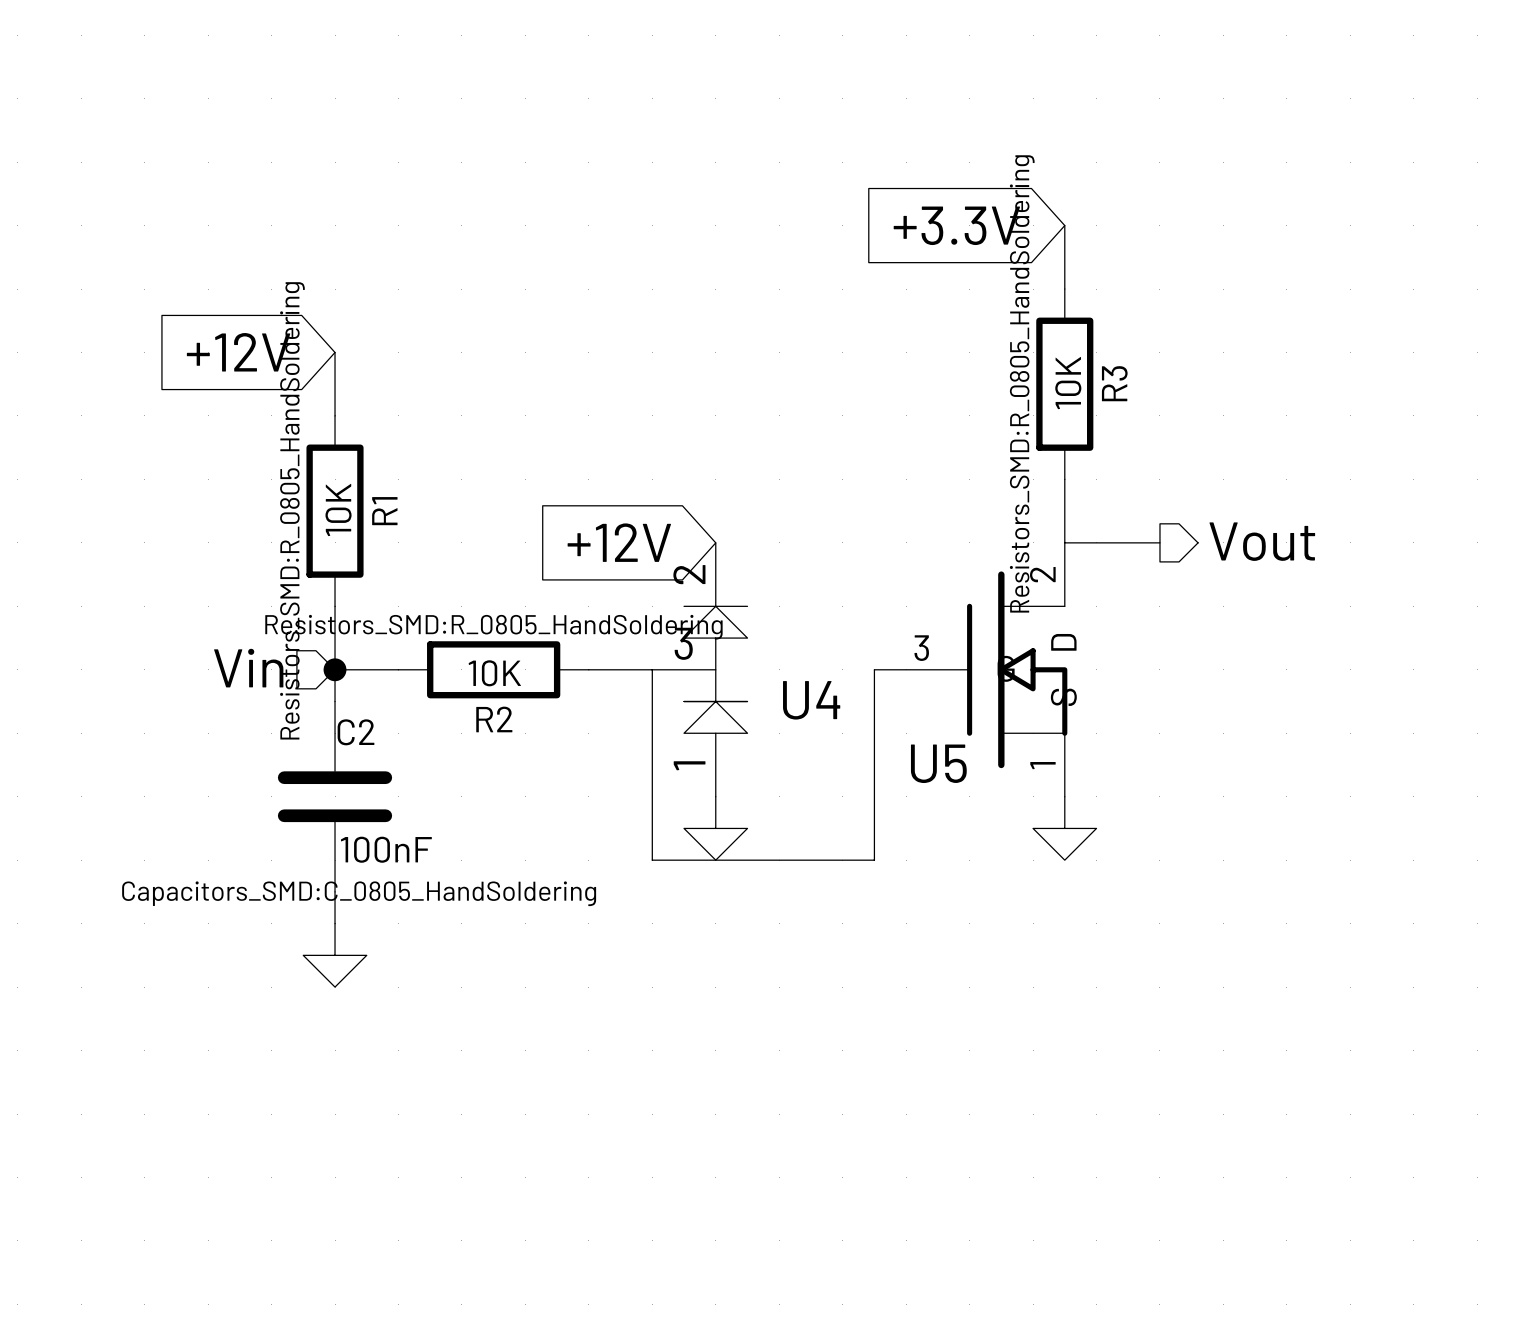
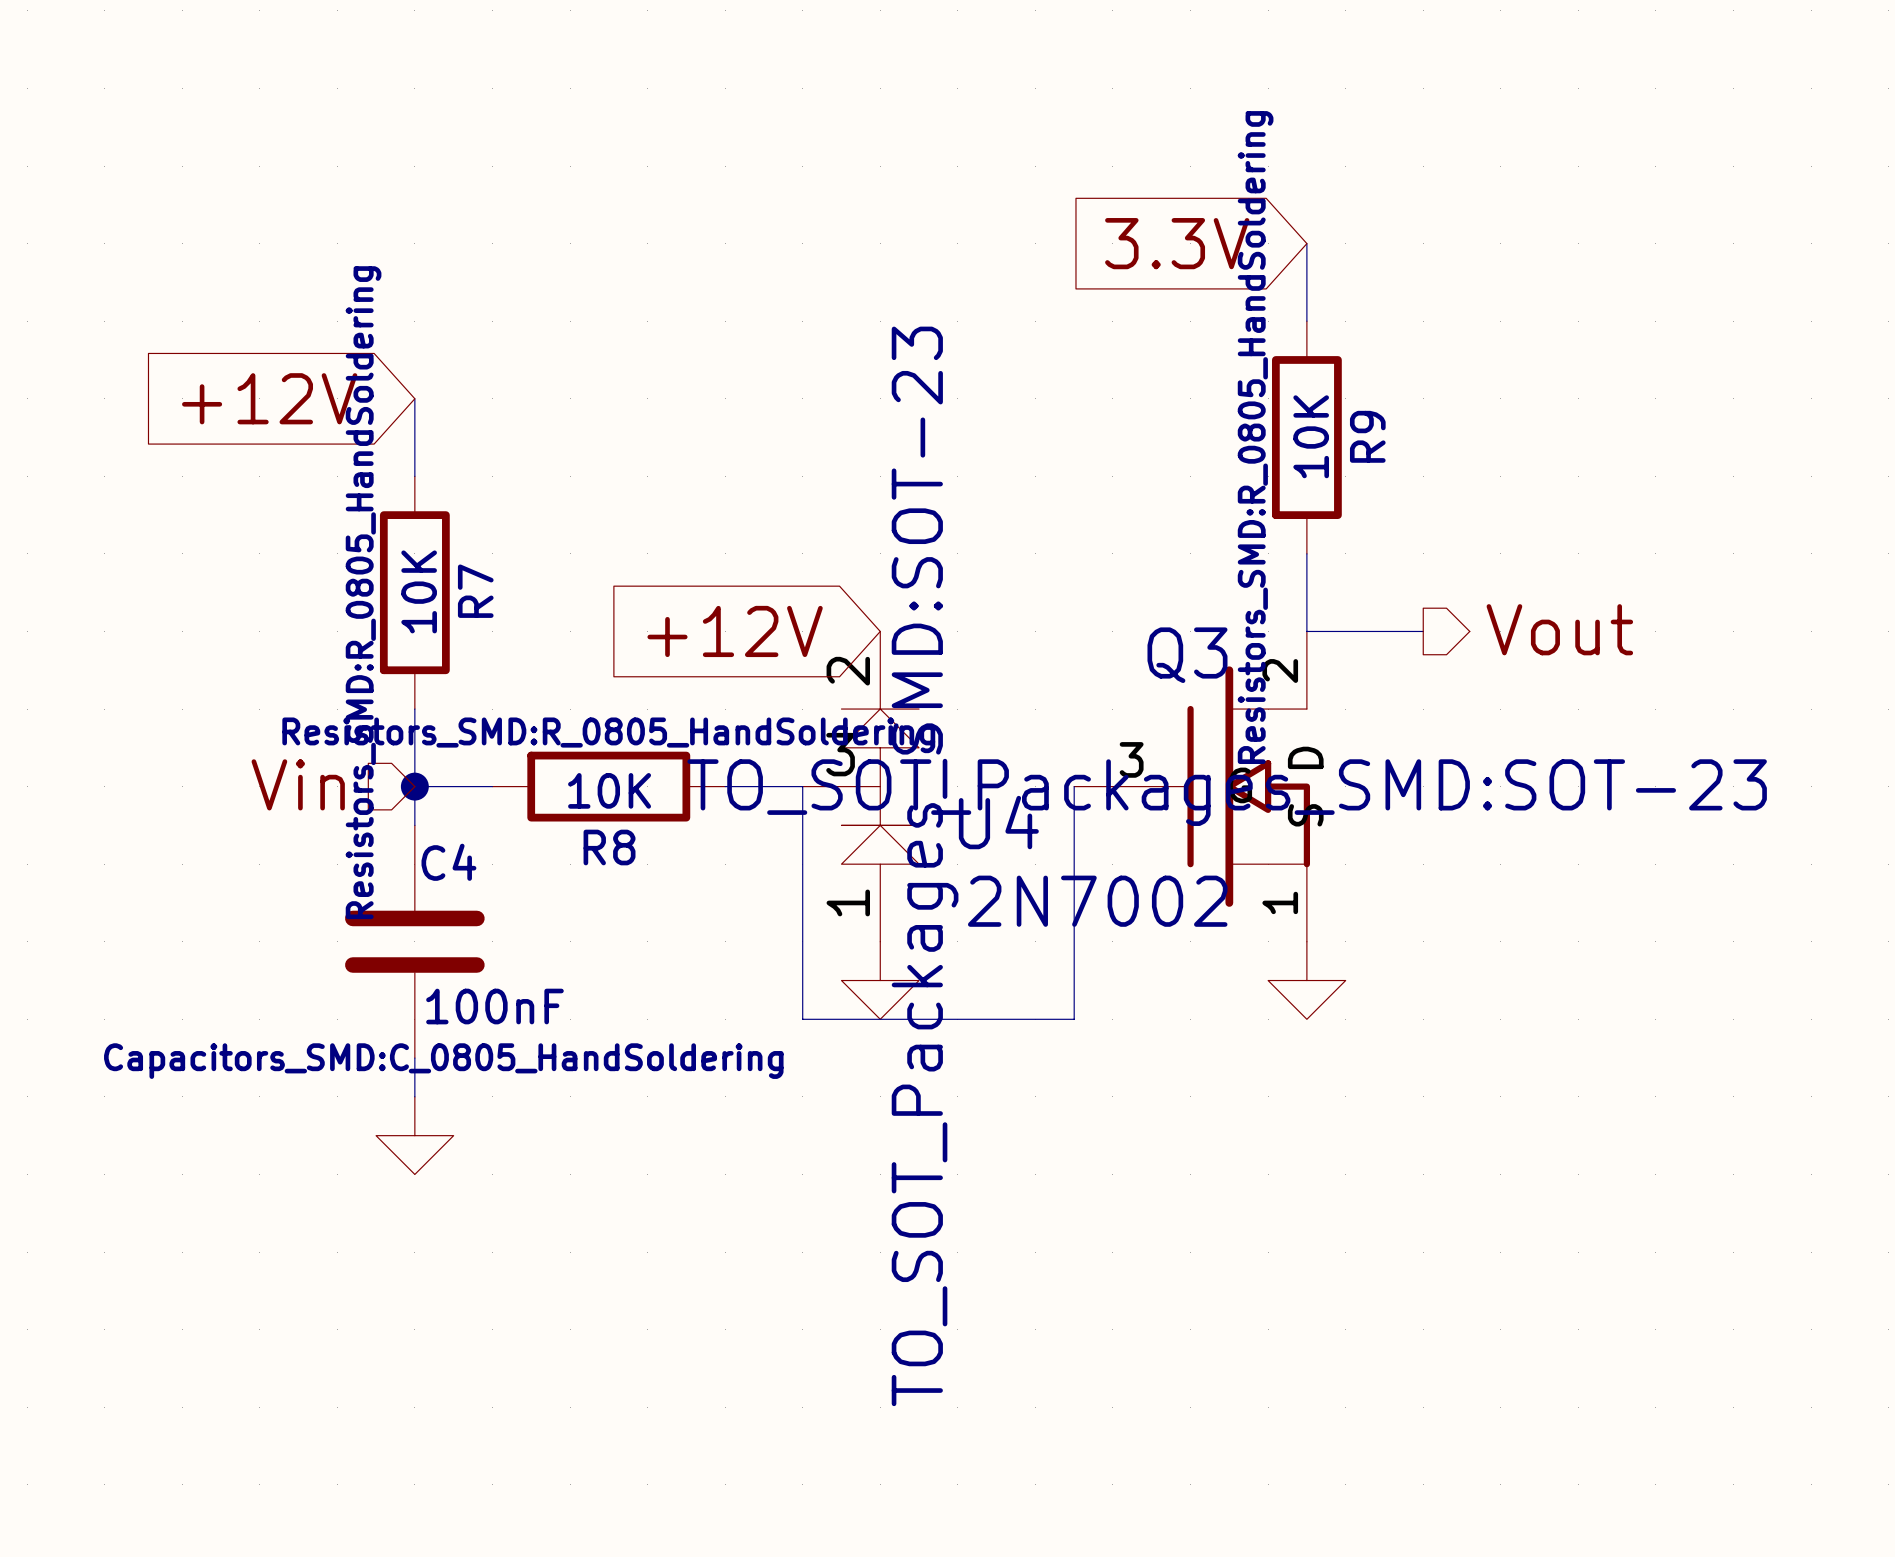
global label: +3.3V (956, 225) -> 3.3V (1177, 243)
R3 name: R3 (1114, 383) -> R9 (1367, 436)
R1 name: R1 (384, 511) -> R7 (475, 591)
U5 text: none -> TO_SOT_Packages_SMD:SOT-23 (1227, 792)
R2 name: R2 (494, 719) -> R8 (609, 847)
C2 name: C2 (355, 732) -> C4 (448, 862)
U4 text: none -> TO_SOT_Packages_SMD:SOT-23 (925, 866)
U5 value: none -> 2N7002 (1097, 901)
U5 name: U5 (938, 763) -> Q3 (1187, 655)

